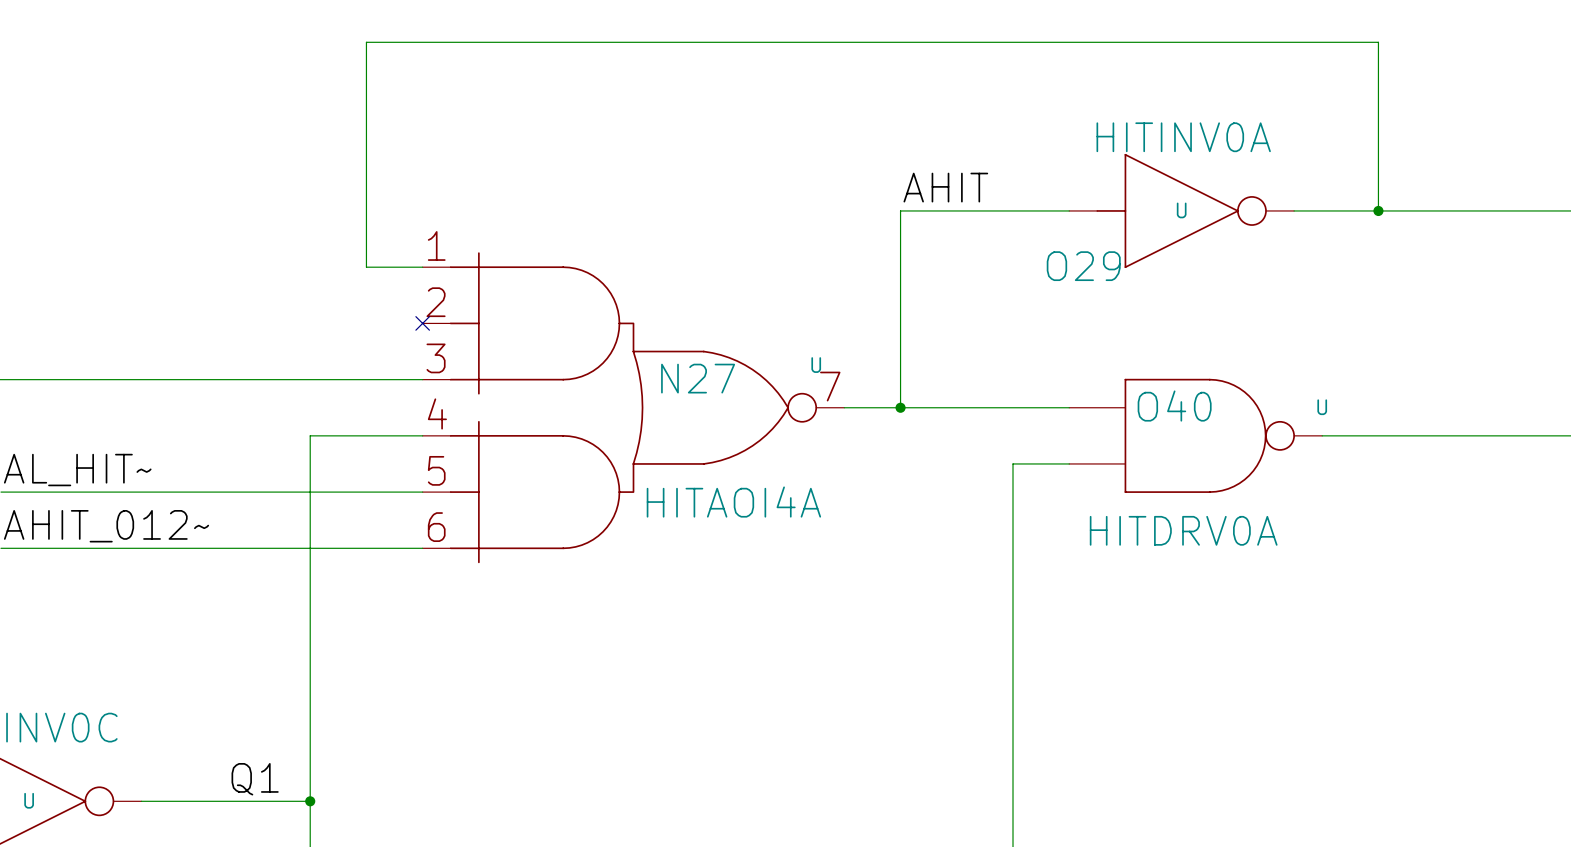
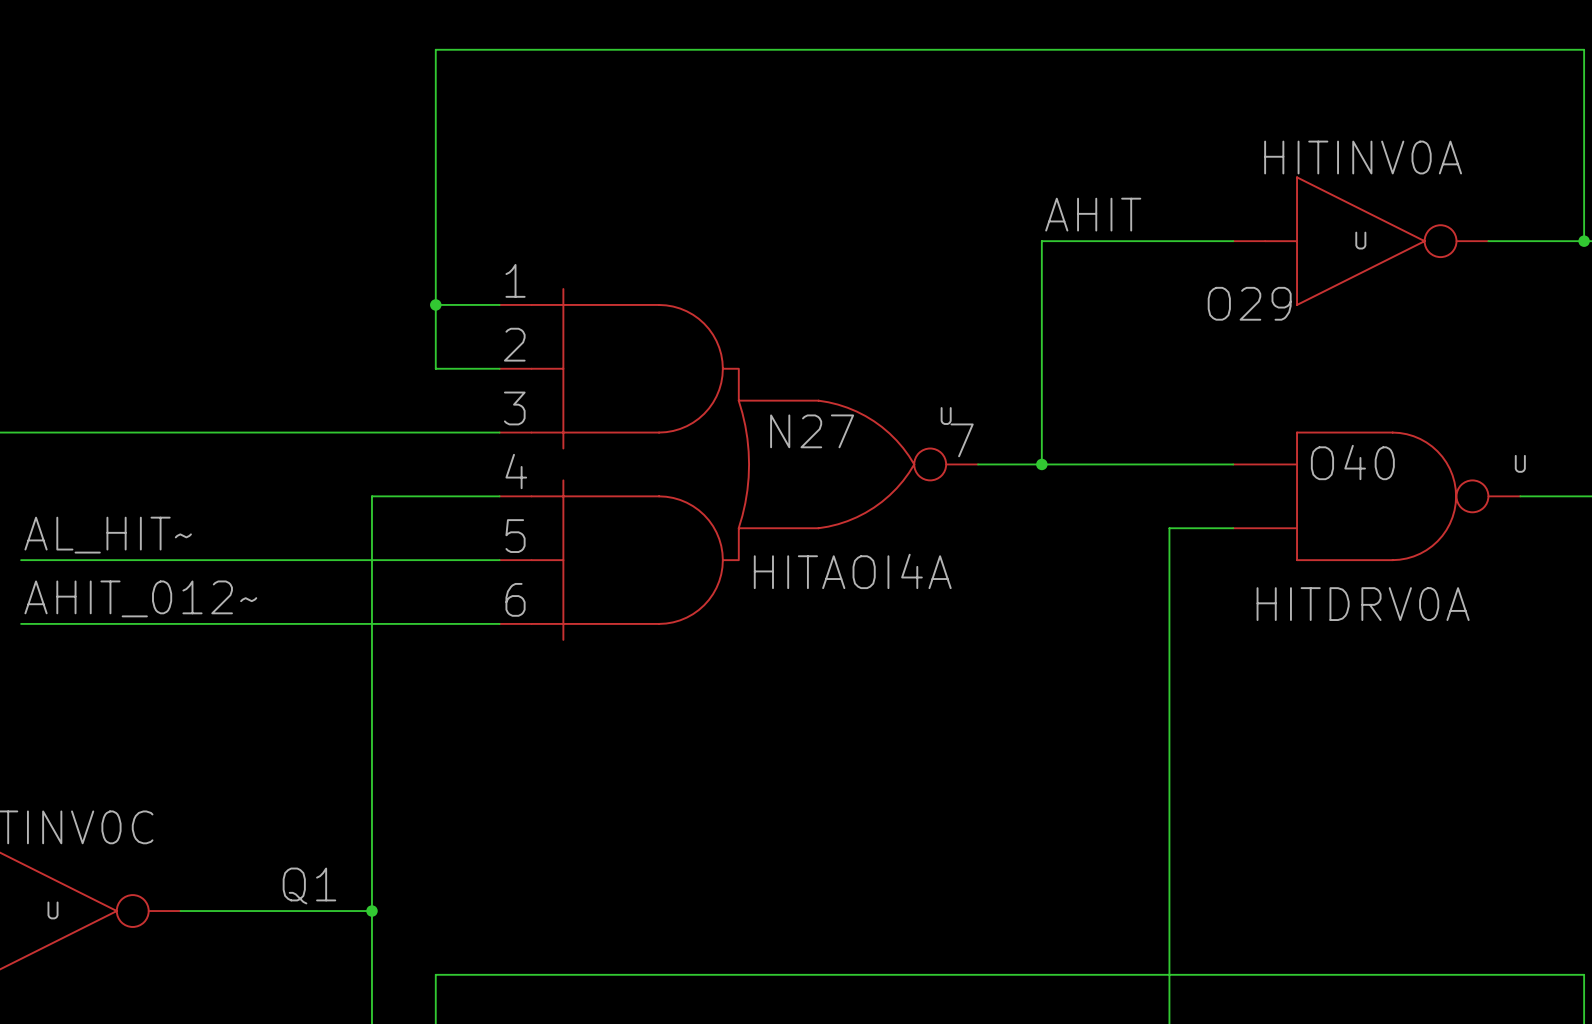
wire: none -> (435, 304) (435, 368) (499, 368)
junction: none -> (435, 304)
no-connect mark: (422, 323) -> none

